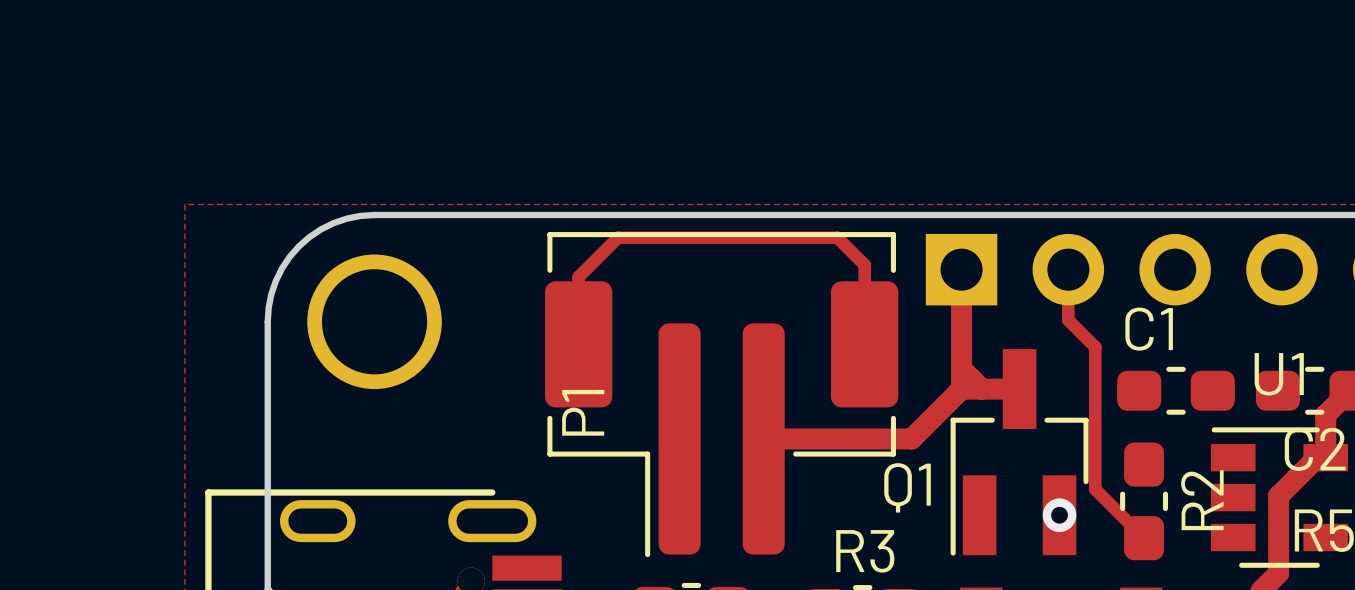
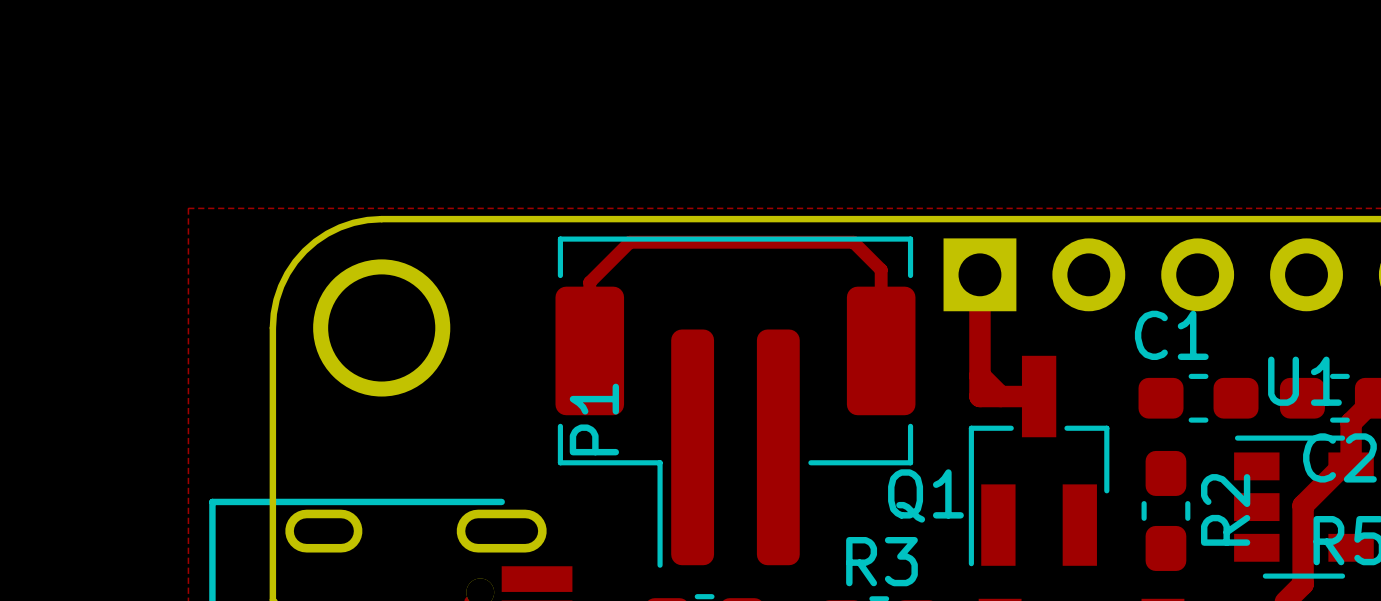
track: (1068, 269) (1068, 320) (1095, 347) (1095, 489) (1144, 538) -> none
track: (971, 378) (911, 438) (763, 438) -> none
via: (1059, 515) -> none

